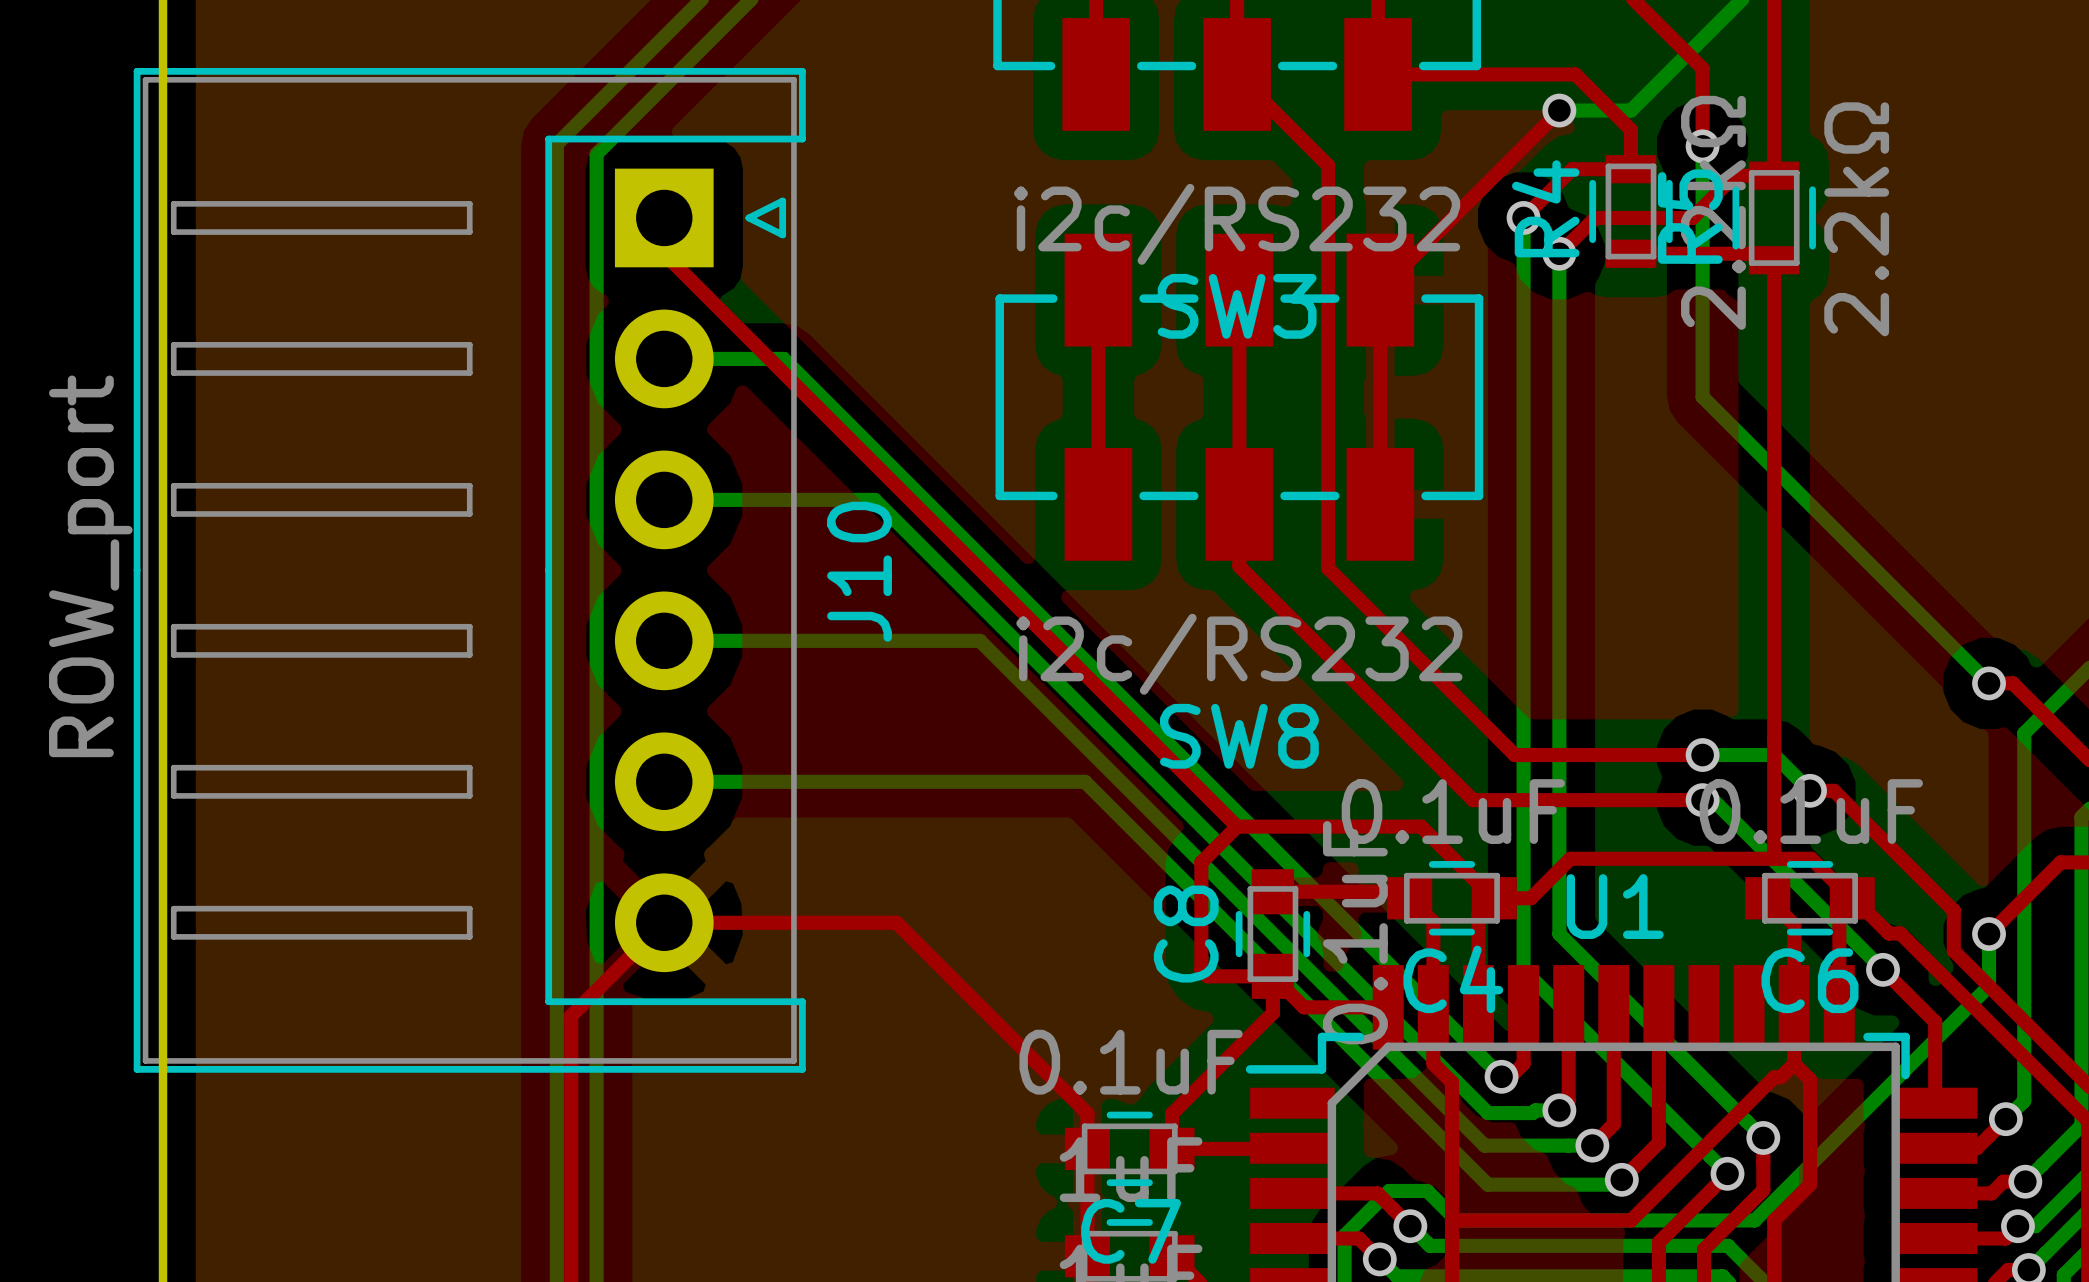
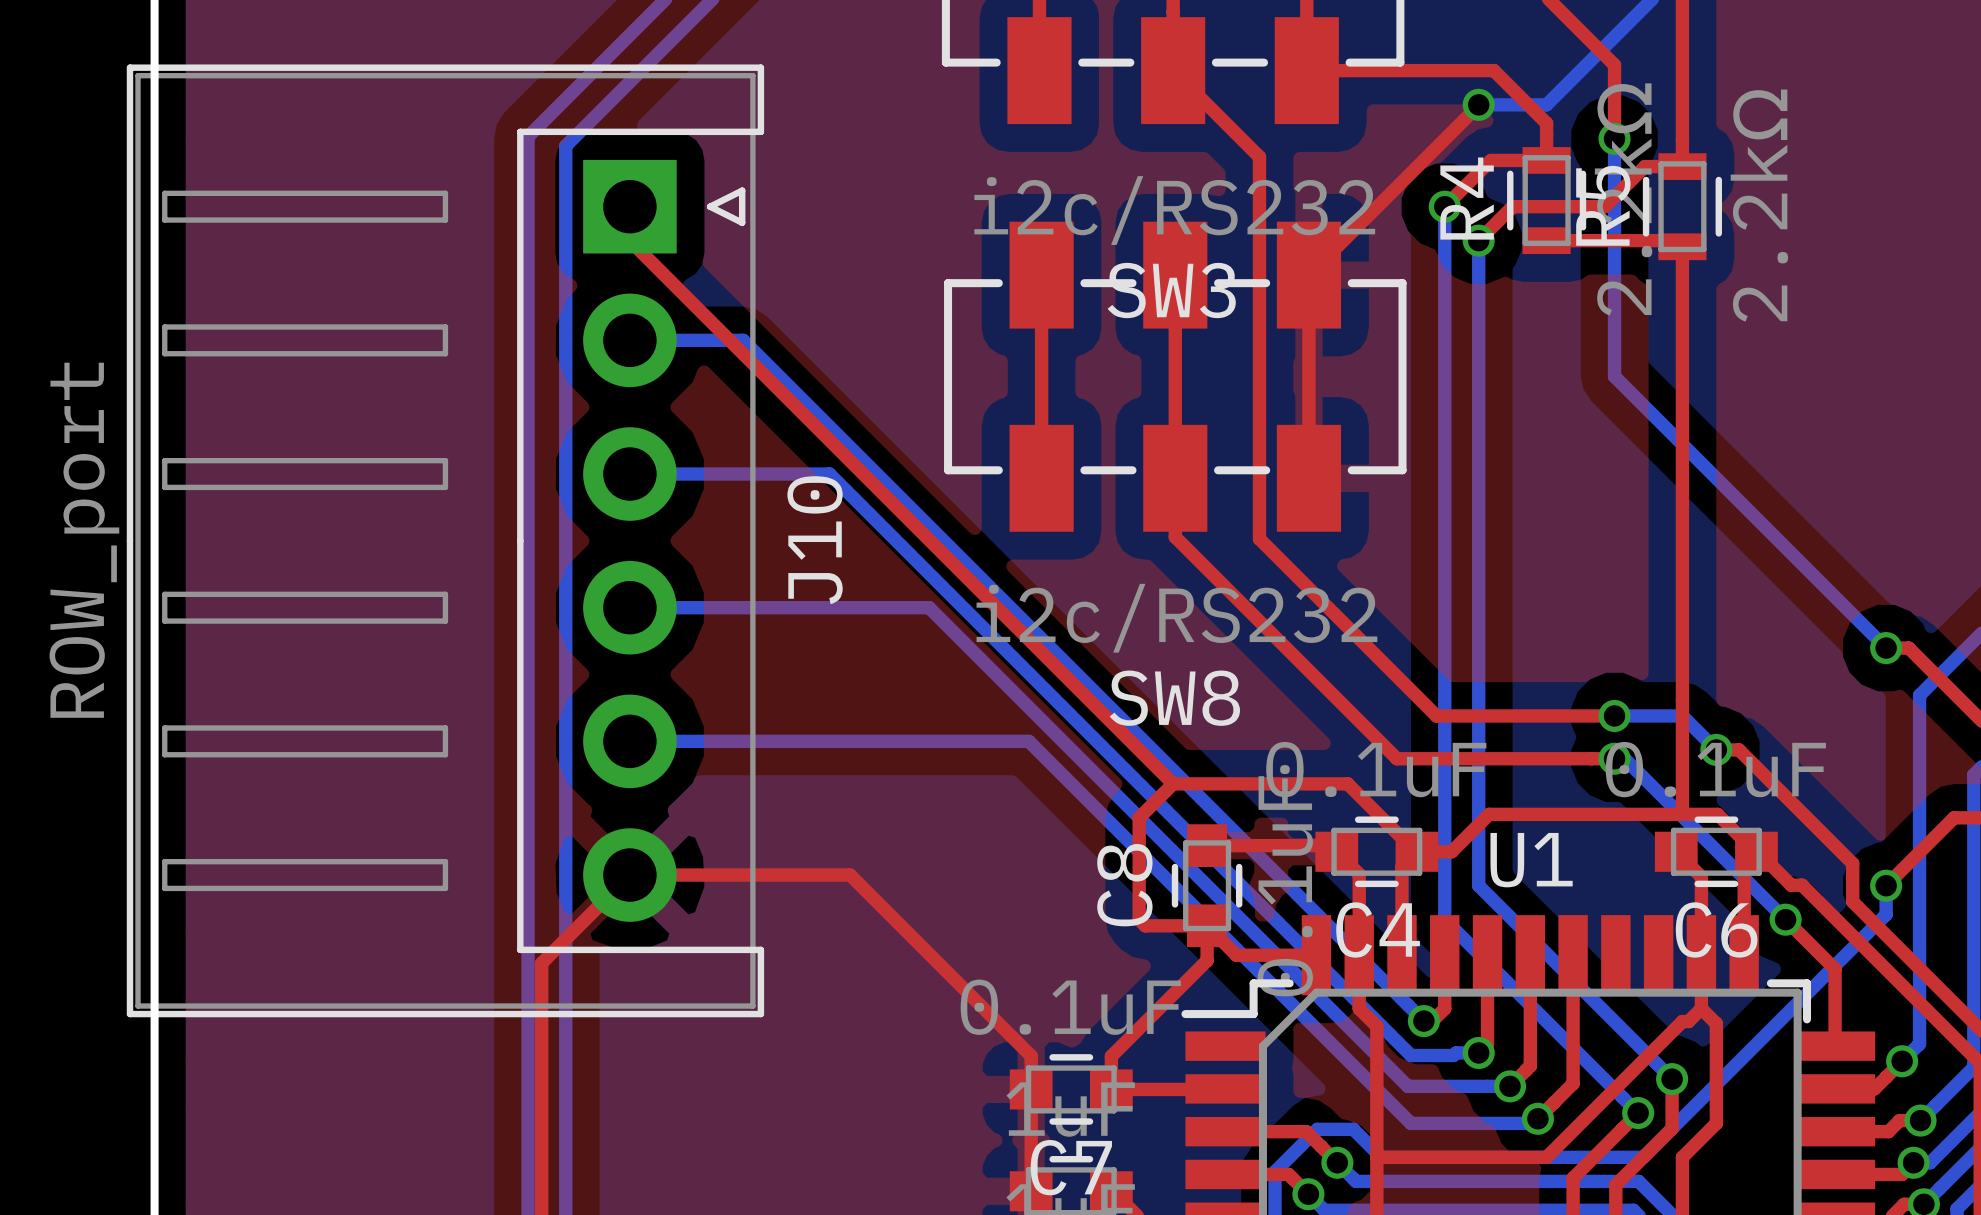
bottom track: (1989, 964) (1989, 986) (1754, 1220) (1732, 1220) -> (1886, 914) (1643, 1157)

